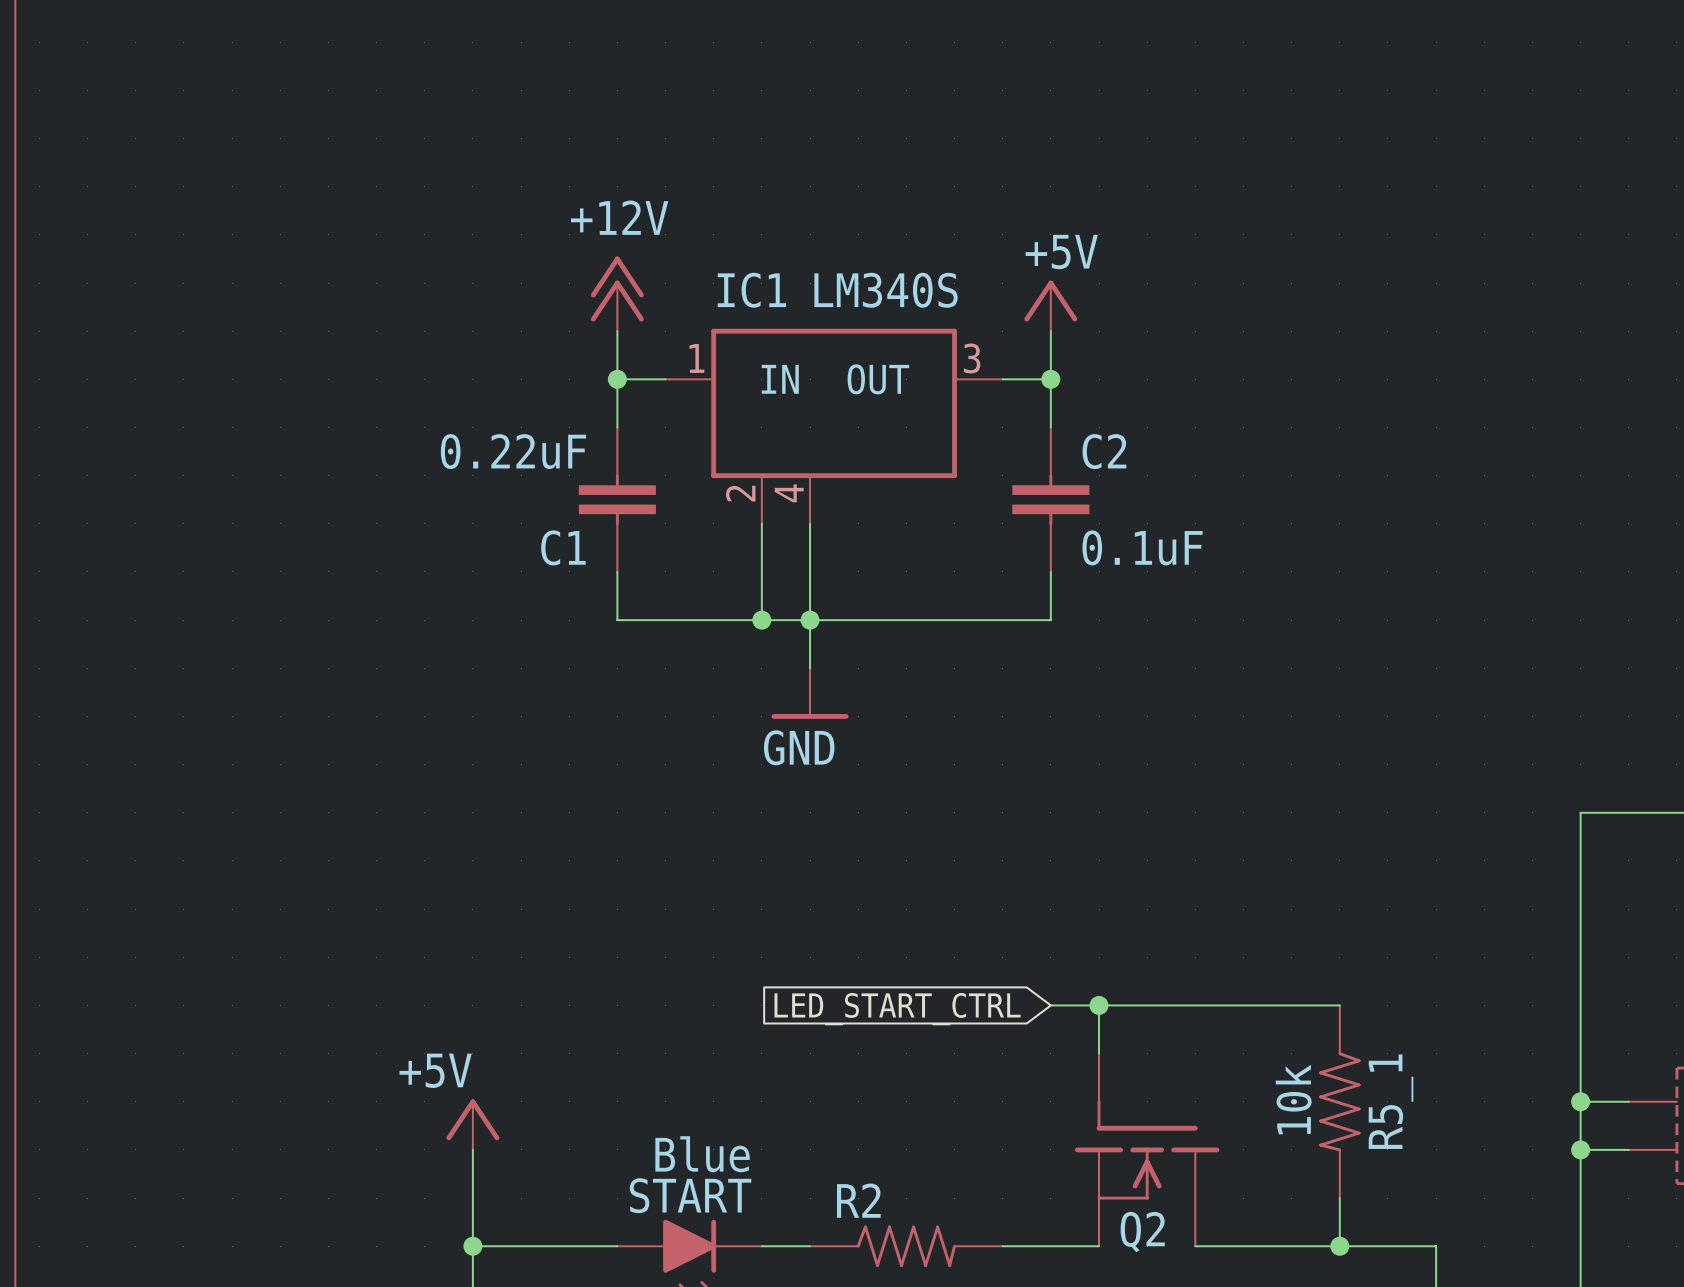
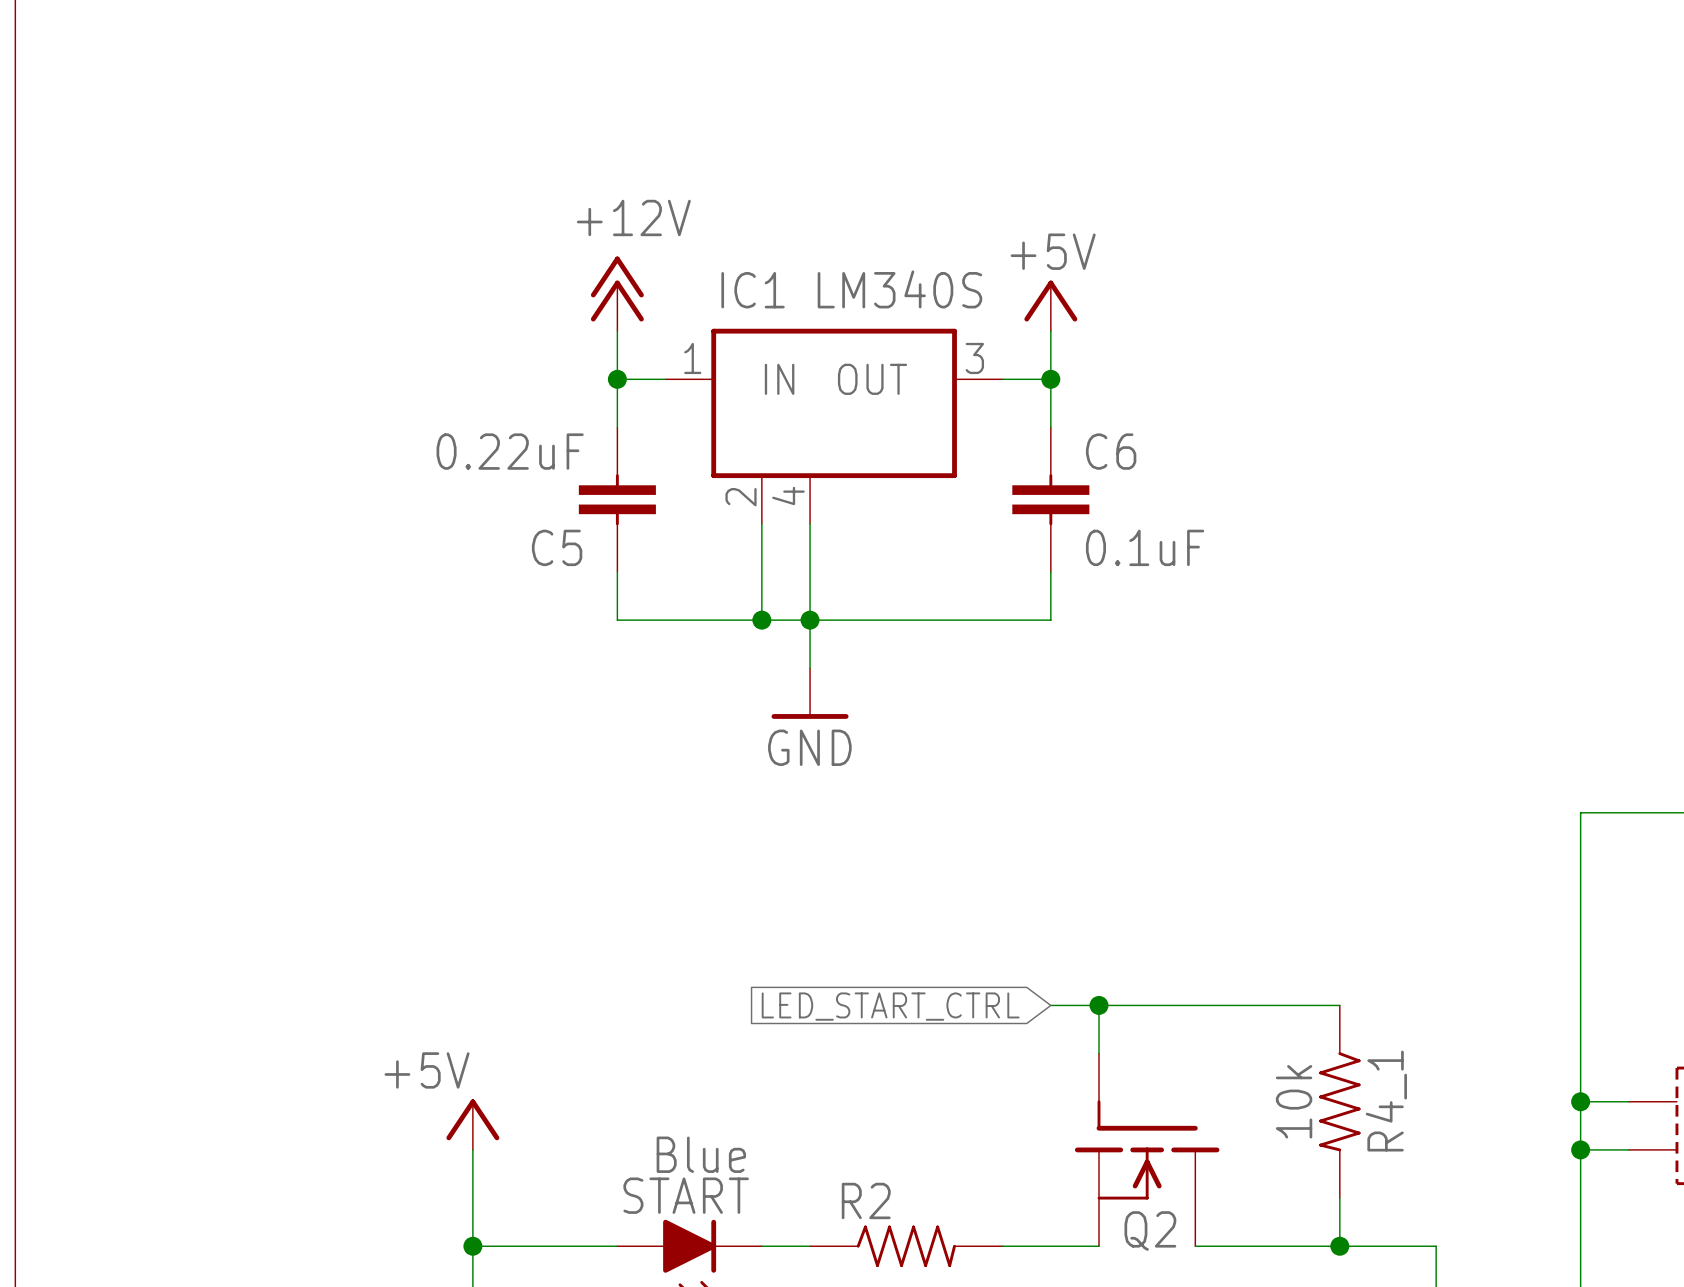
C2 name: C2 (1104, 451) -> C6 (1111, 451)
C1 name: C1 (563, 547) -> C5 (557, 547)
R5_1 name: R5_1 (1391, 1101) -> R4_1 (1386, 1101)

